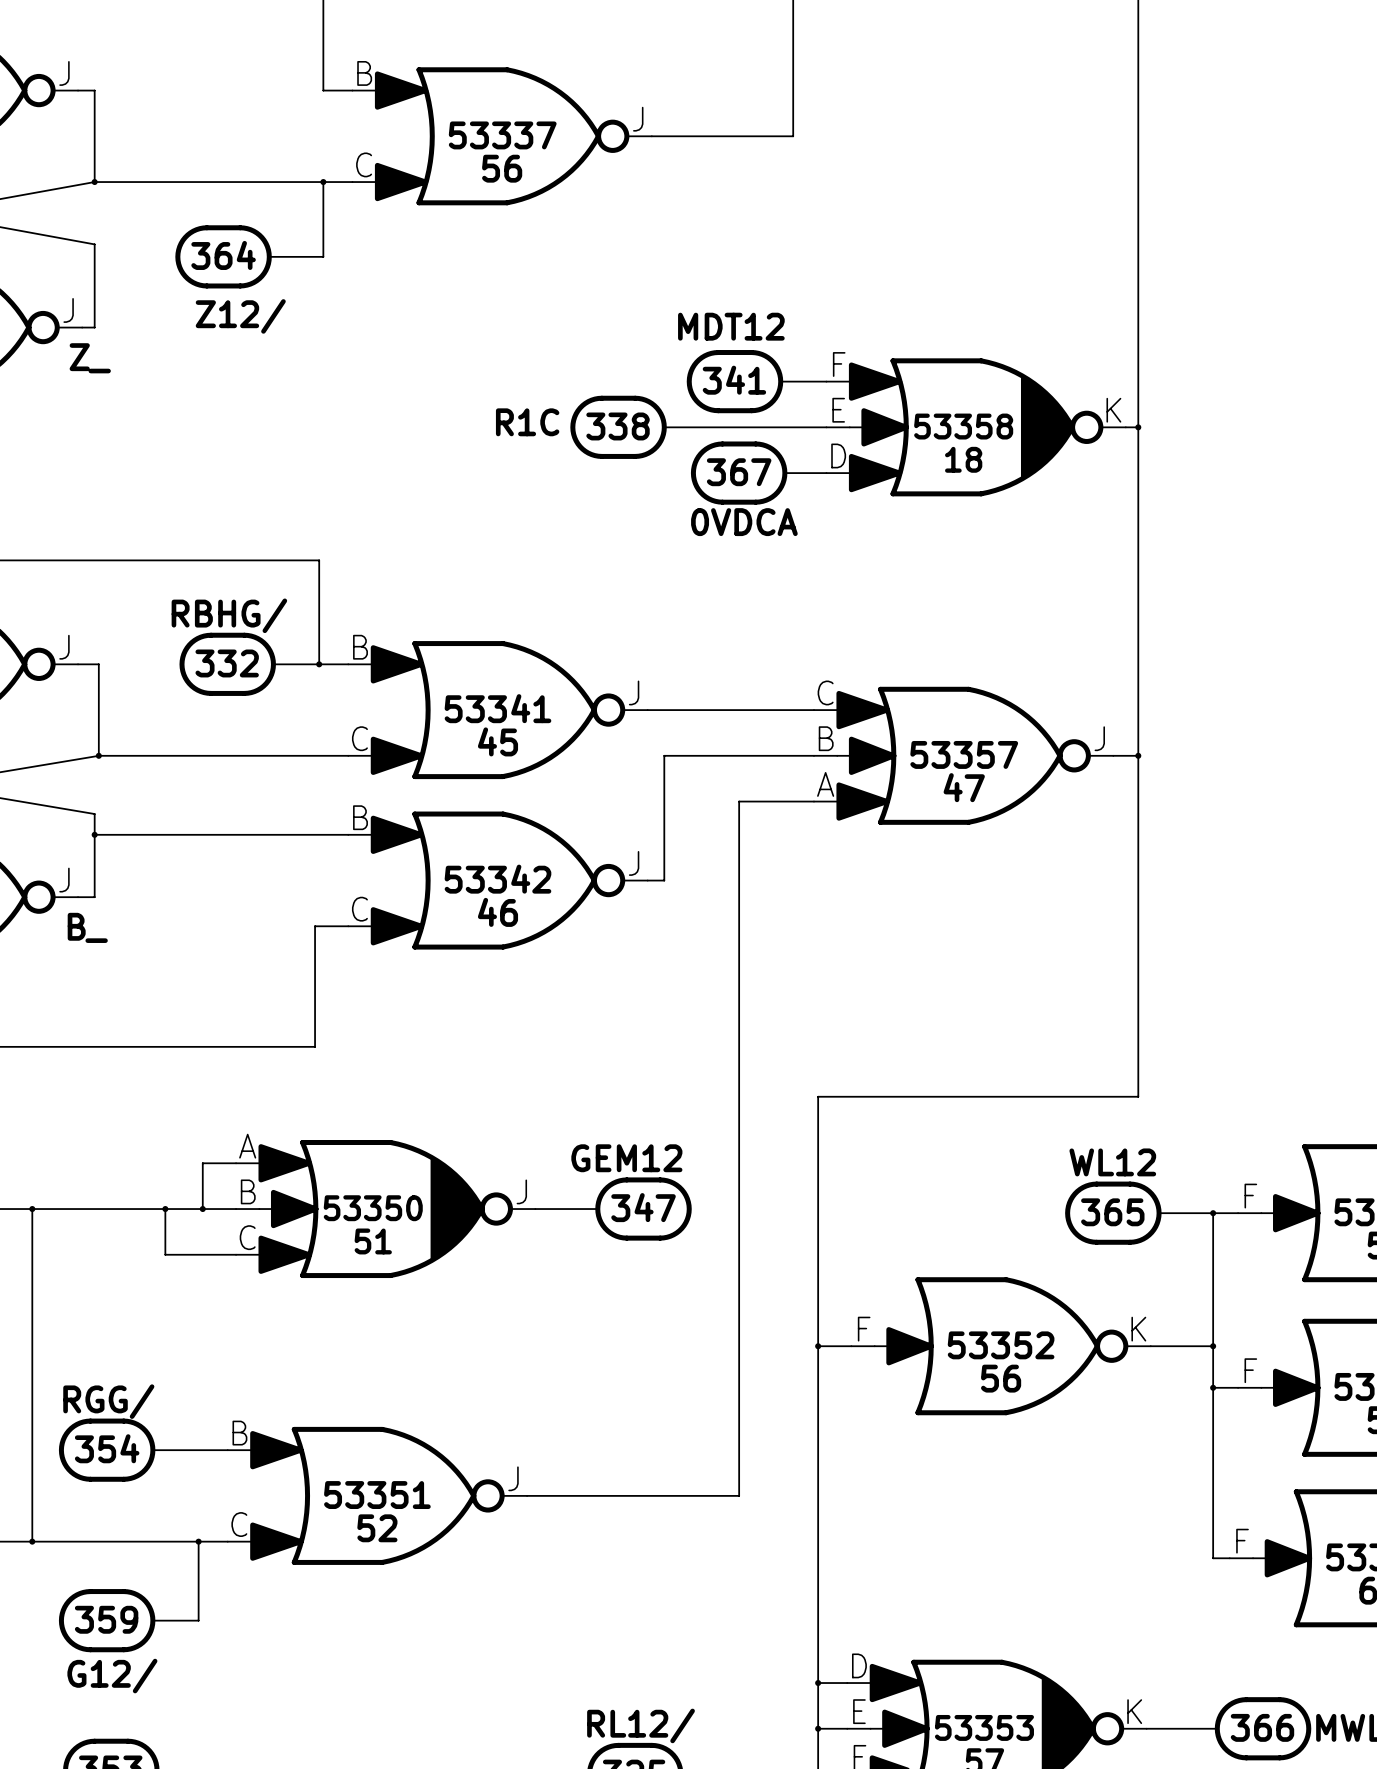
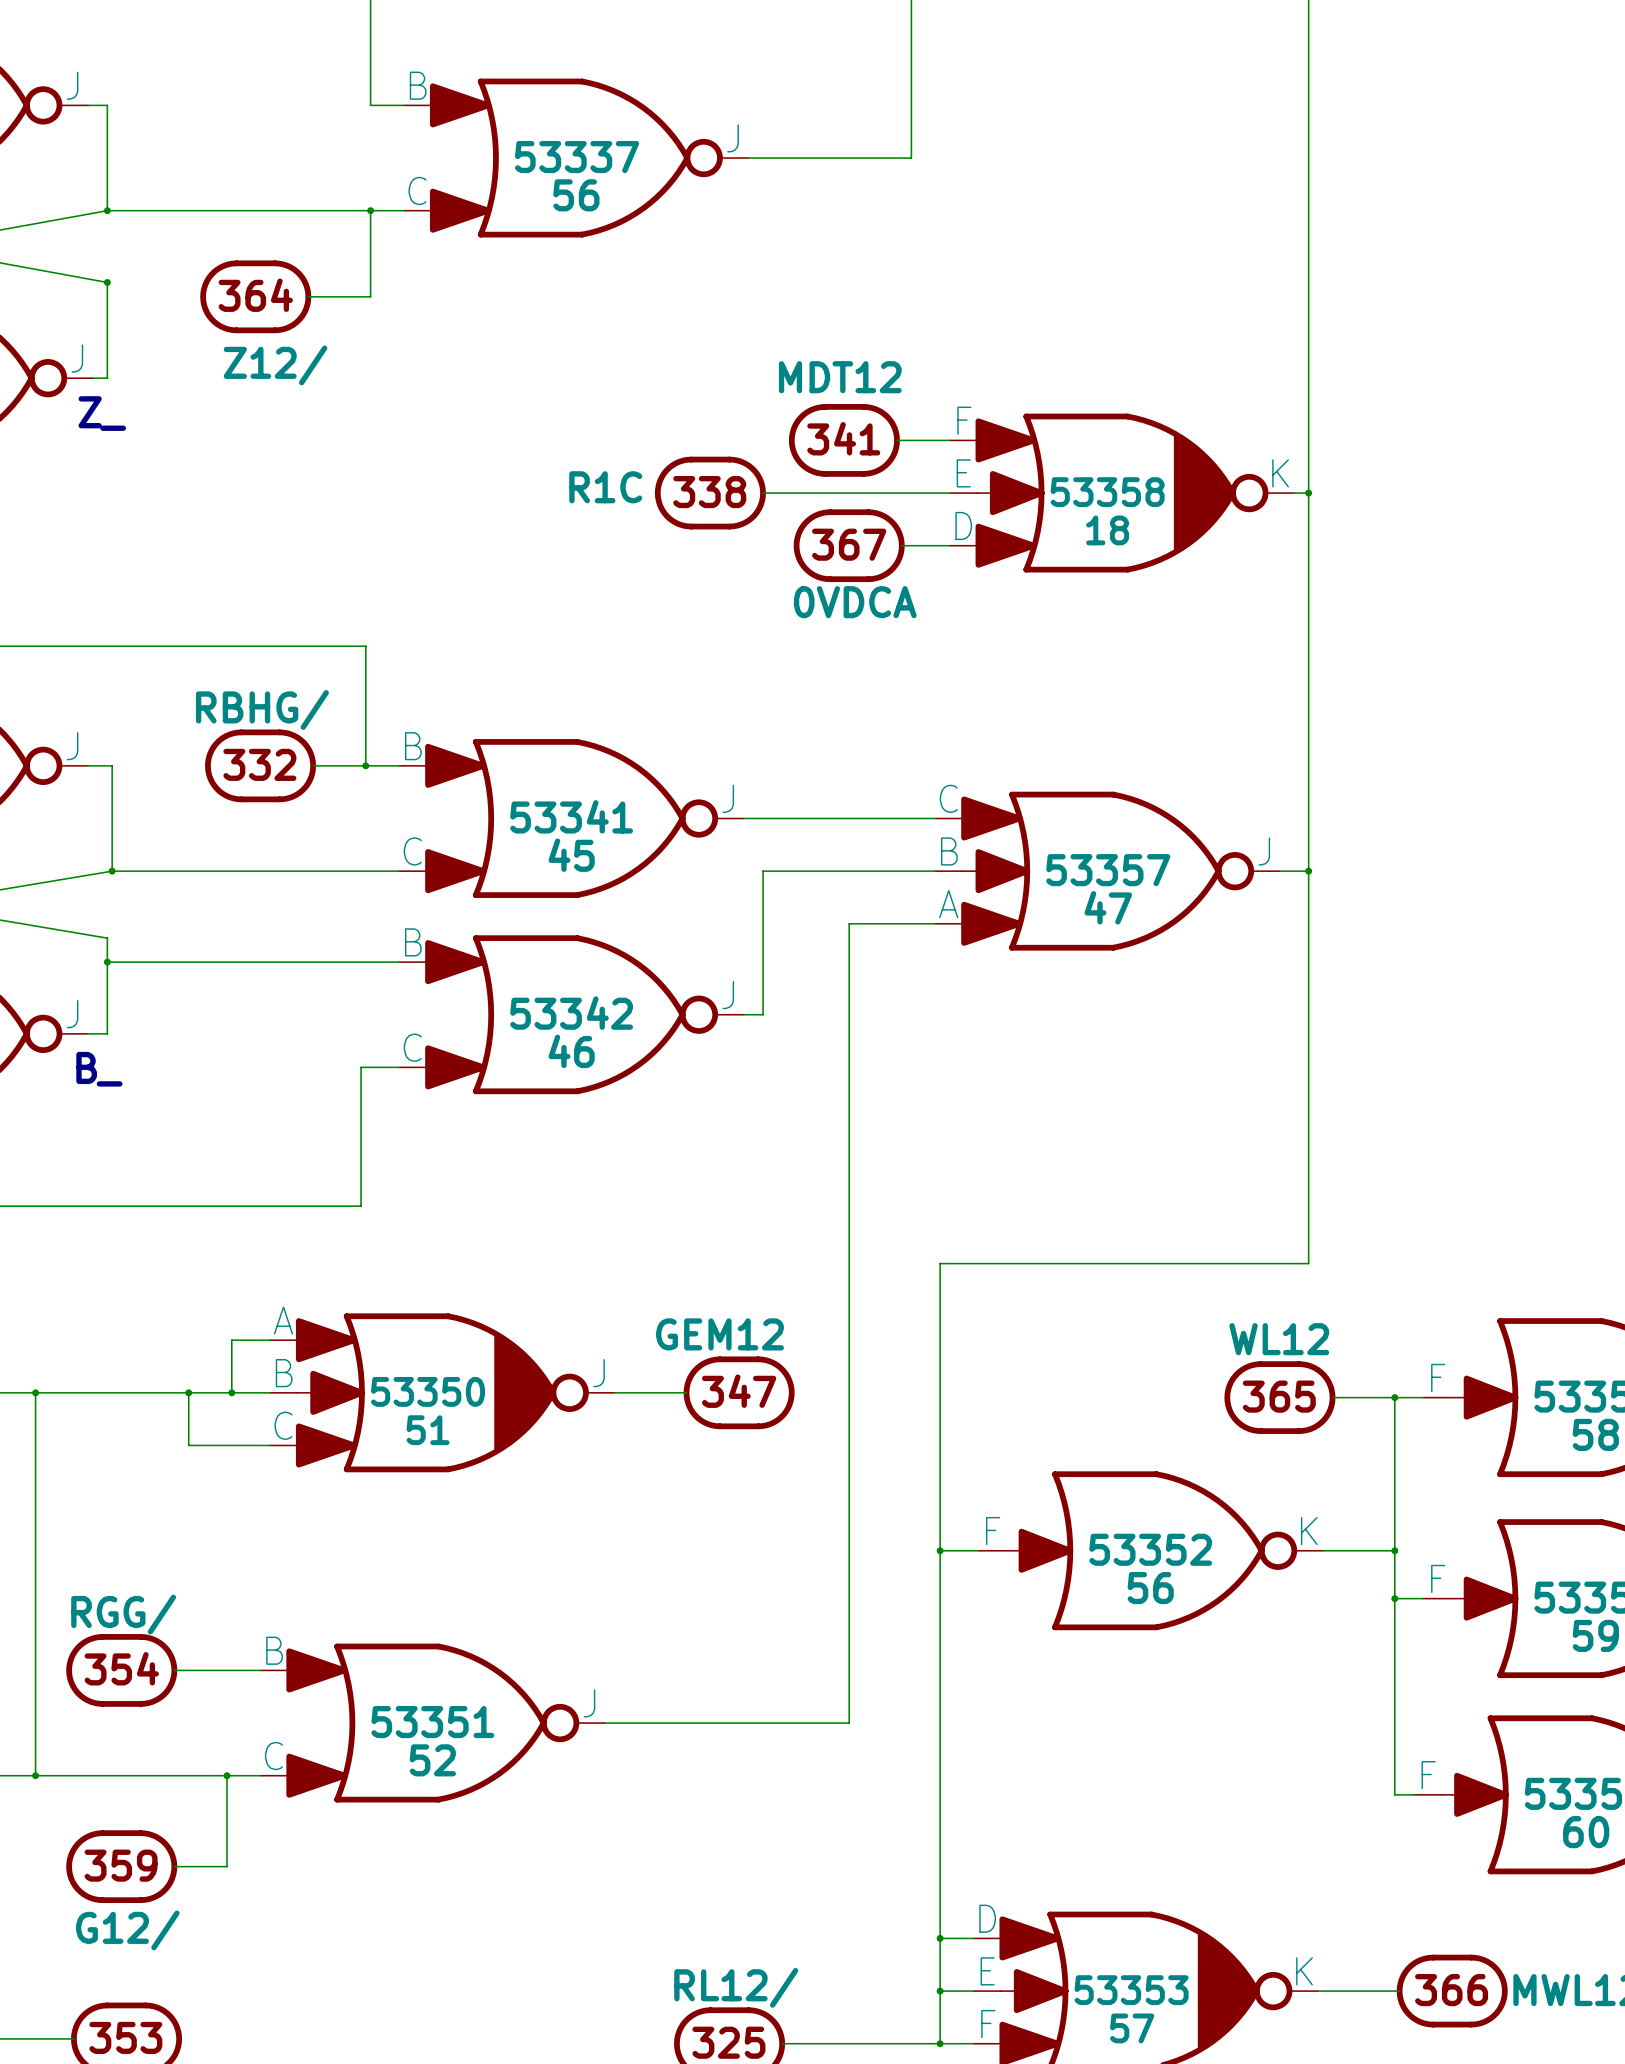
junction: none -> (107, 282)

